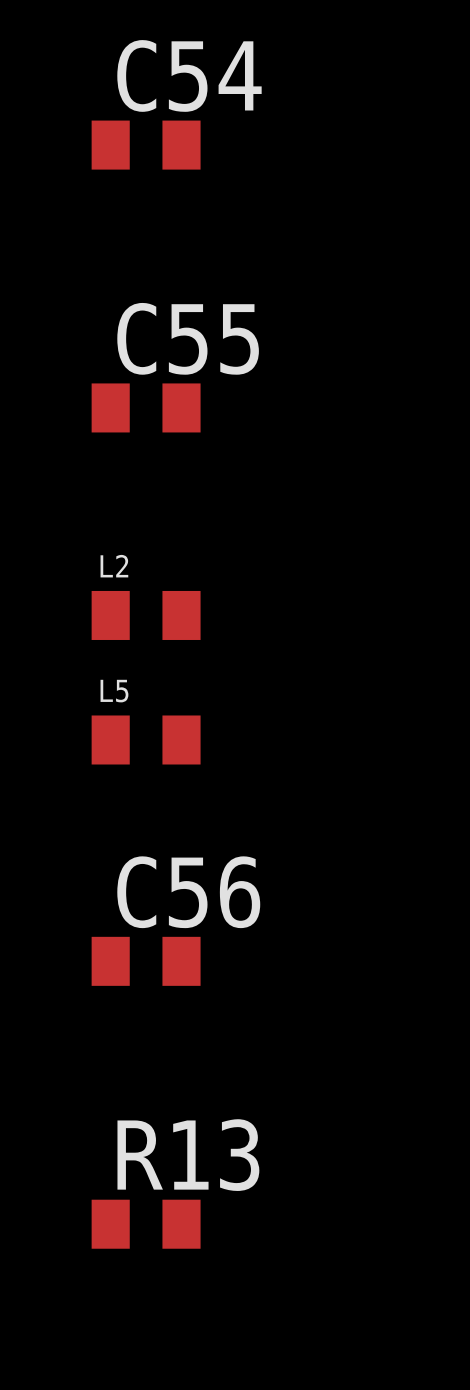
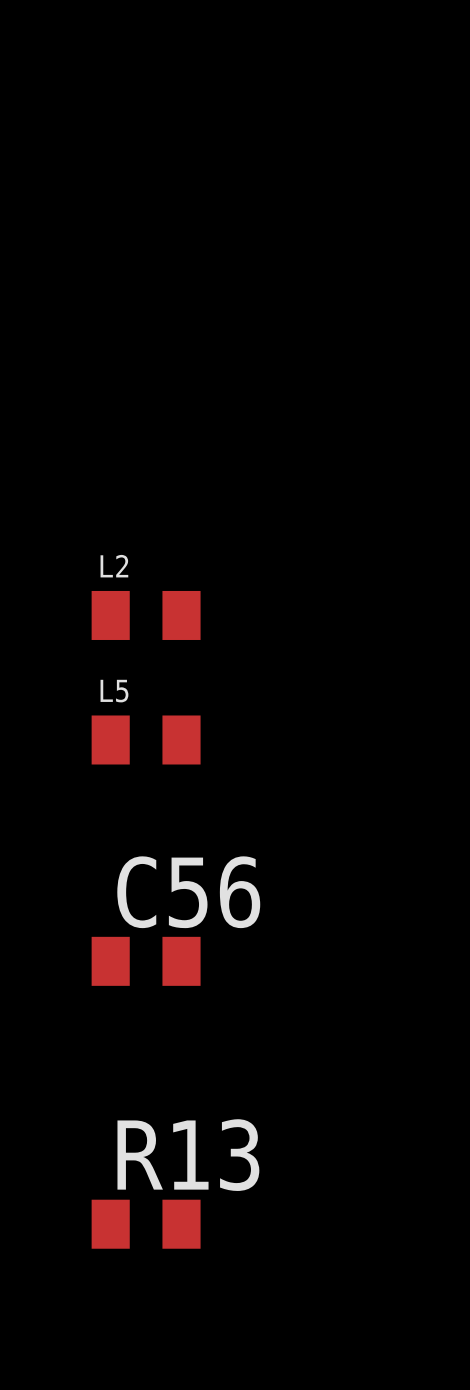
C54: (146, 145) -> none
C55: (146, 407) -> none

